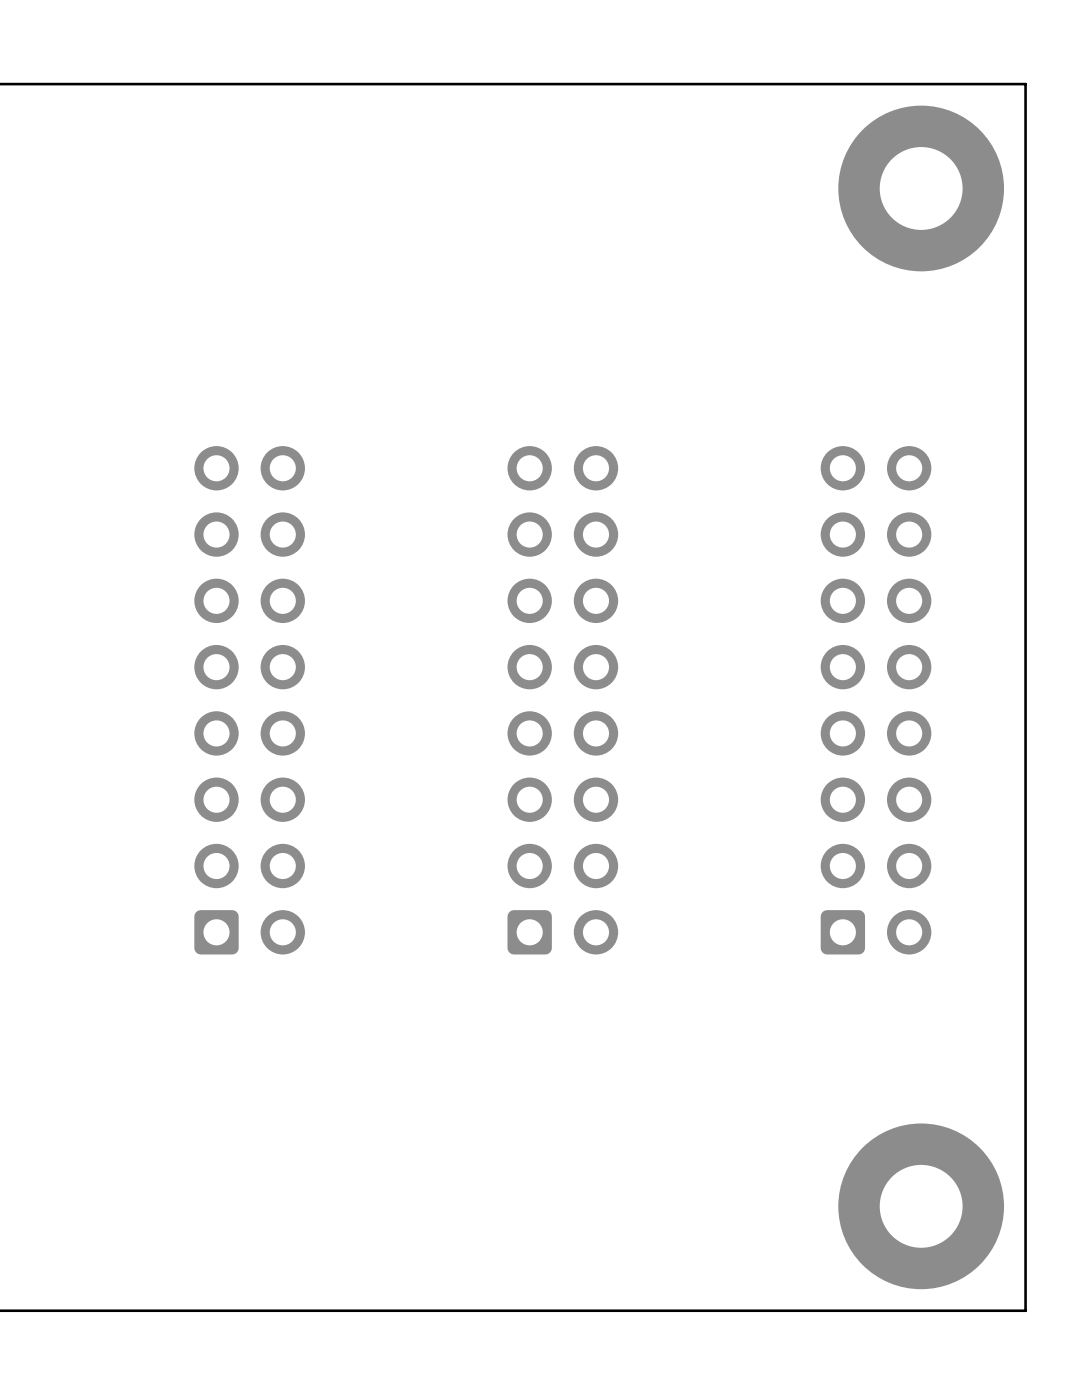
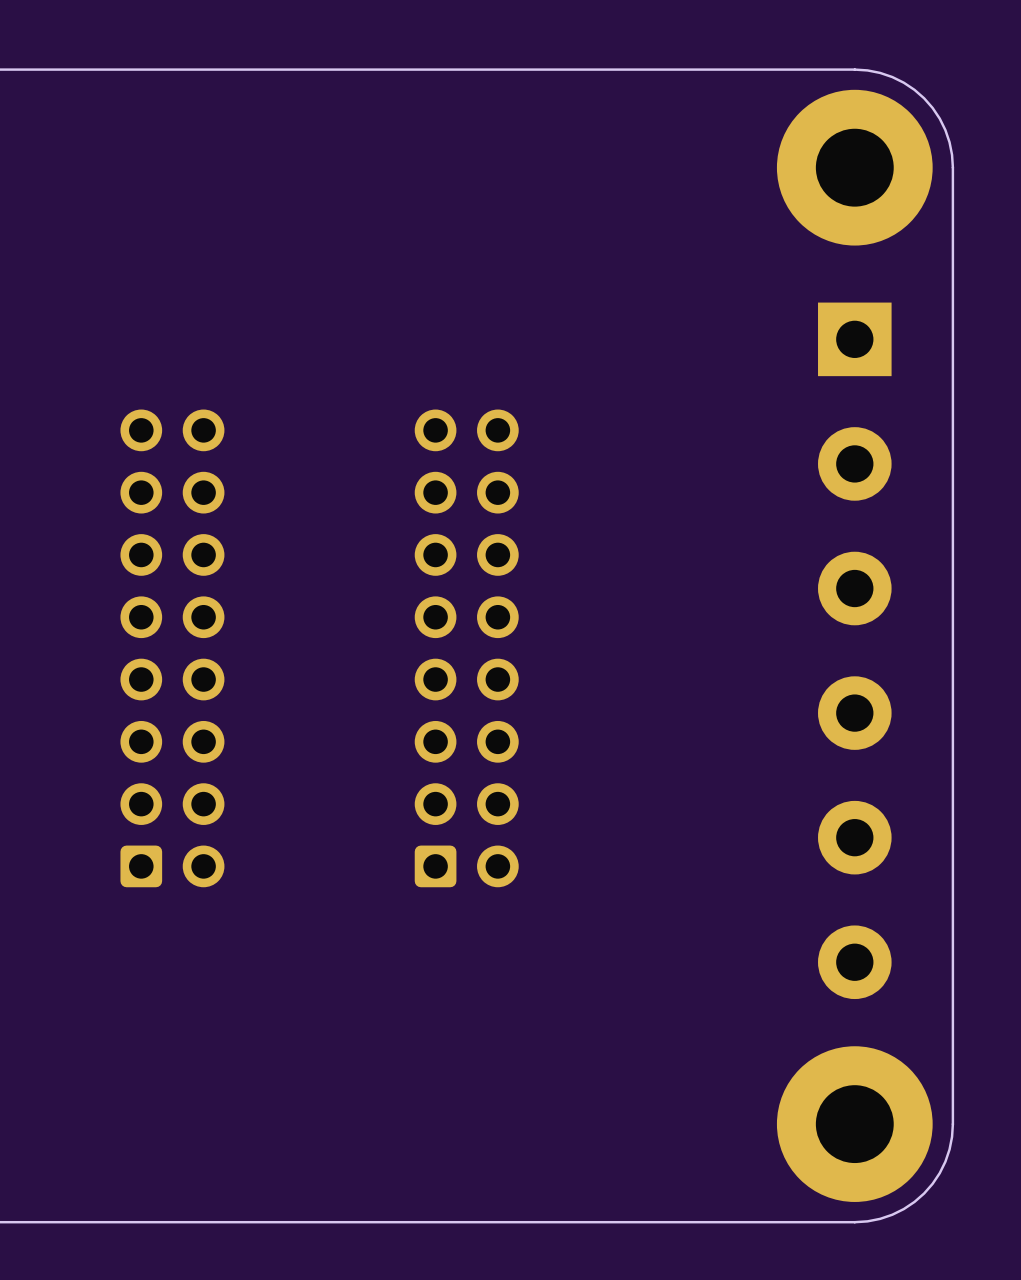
board edge: (921, 84) (1025, 84) (1025, 188) -> (854, 69) (867, 70) (892, 77) (914, 89) (924, 98) (932, 107) (945, 130) (952, 154) (952, 167)
part position: (249, 700) -> (172, 648)
part position: (562, 700) -> (466, 648)
part: (876, 700) -> none
part: none -> (854, 650)
board edge: (1025, 1206) (1025, 1310) (921, 1310) -> (952, 1124) (952, 1136) (945, 1161) (939, 1173) (924, 1193) (903, 1209) (892, 1214) (880, 1218) (854, 1222)

